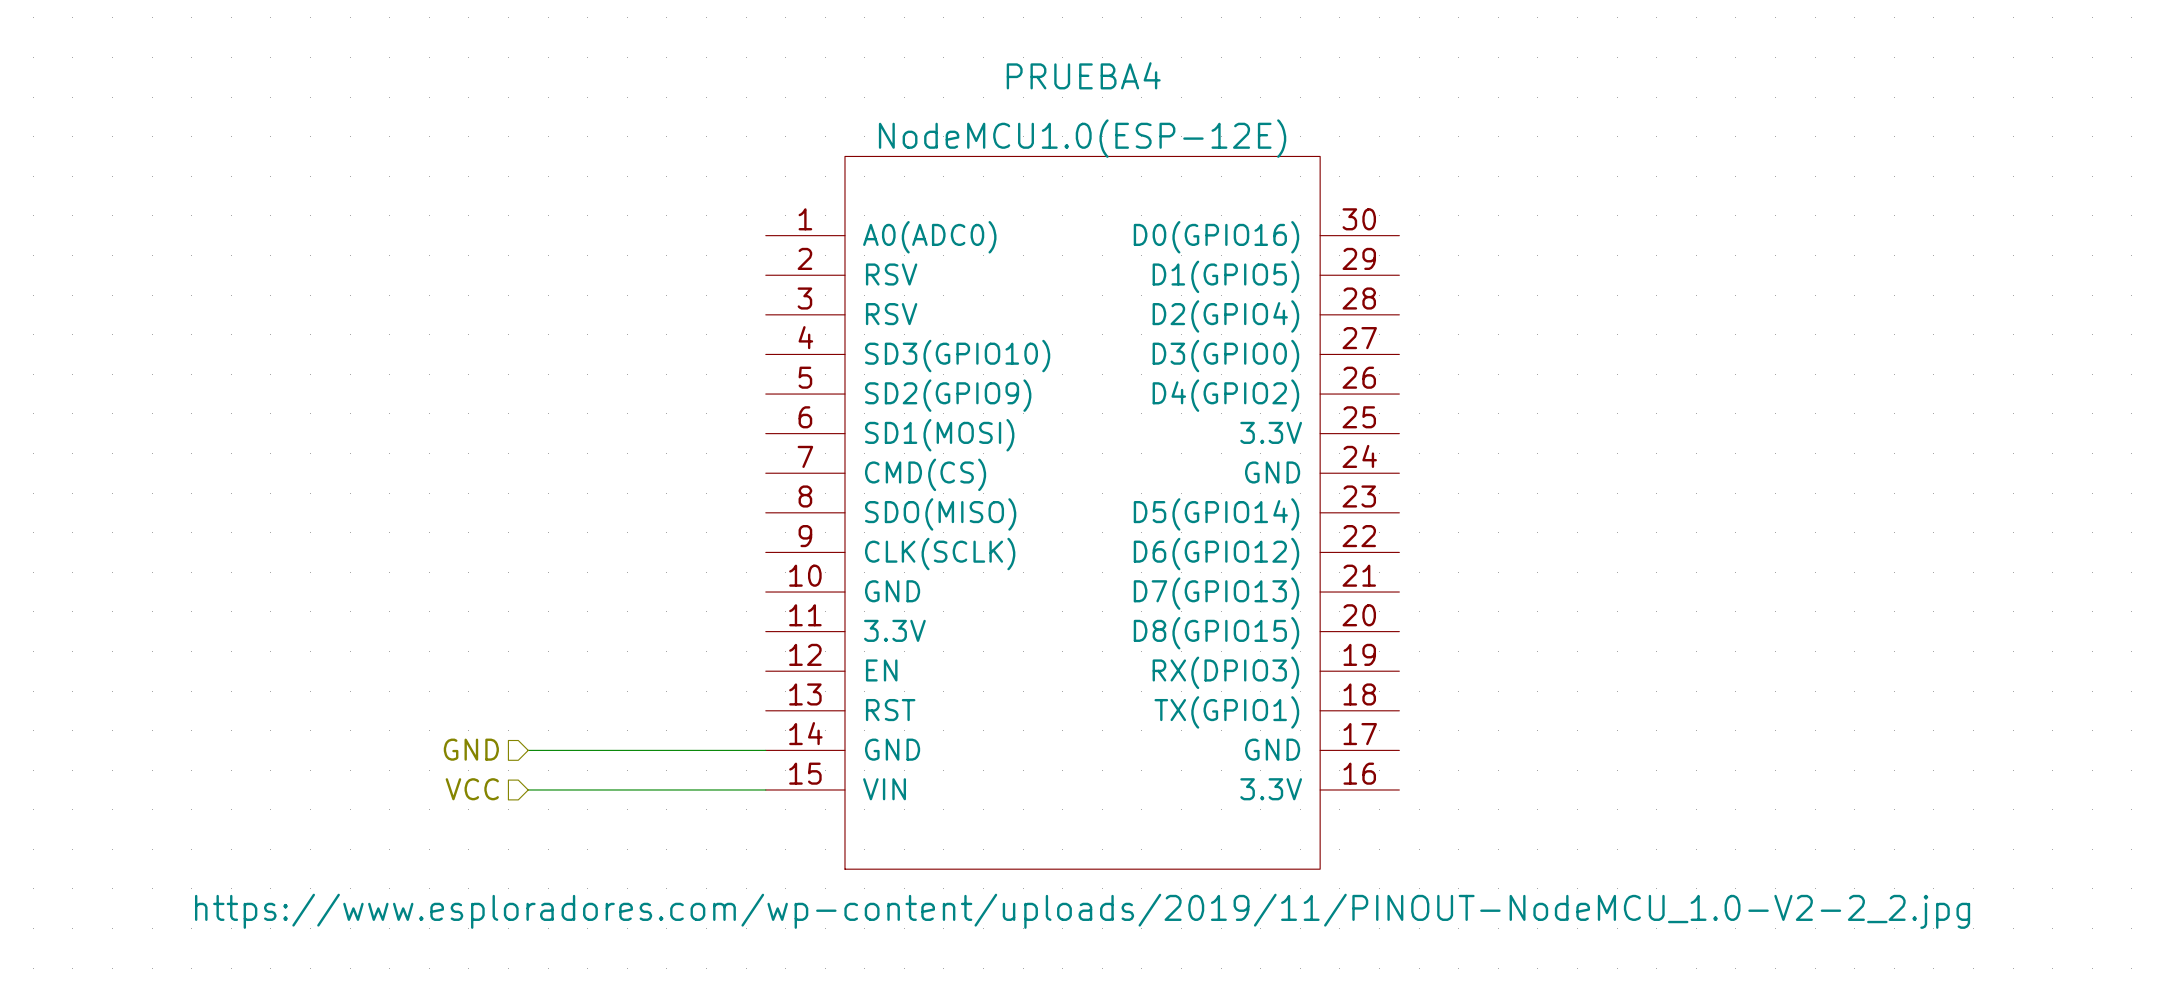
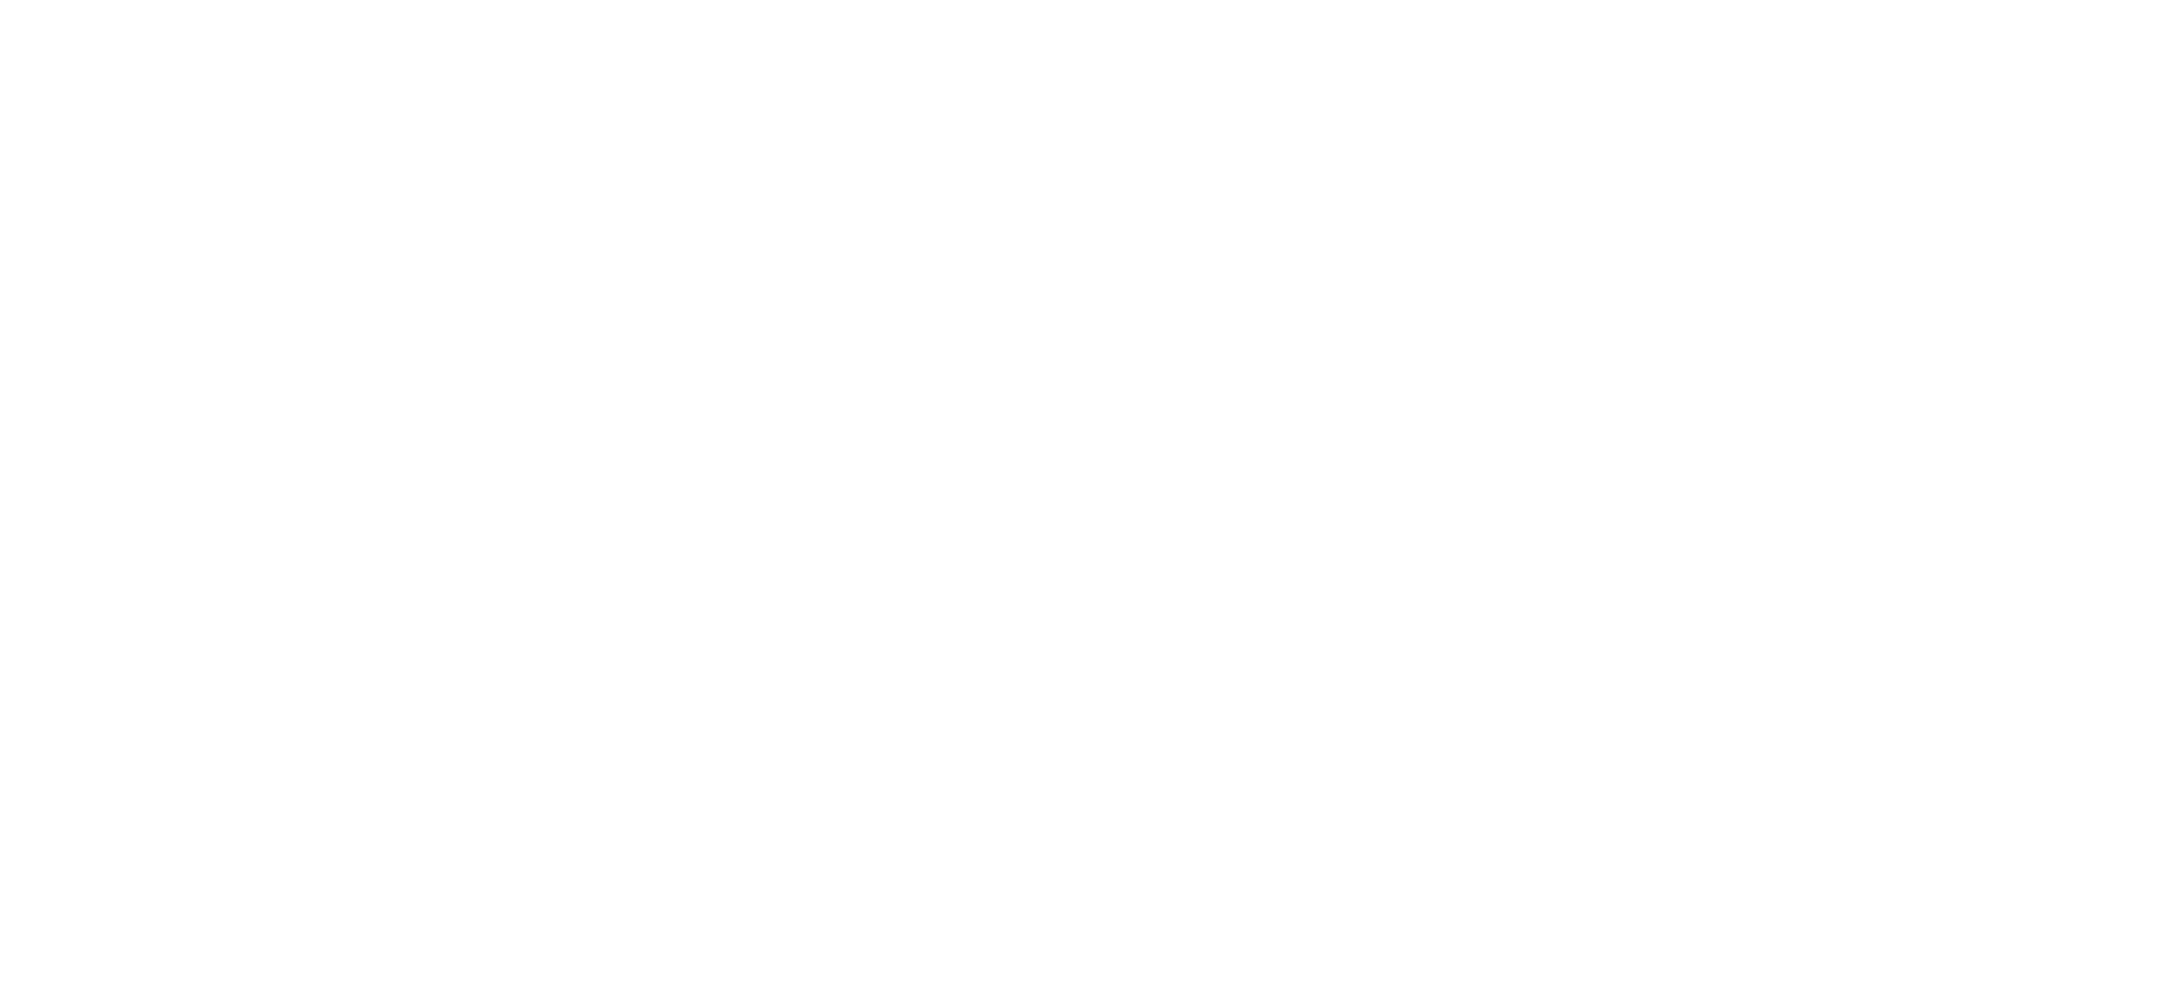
PRUEBA4: NodeMCU1.0(ESP-12E) (1082, 512) -> none
hierarchical label: GND (471, 749) -> none
wire: (528, 750) (765, 750) -> none
hierarchical label: VCC (472, 789) -> none
wire: (528, 789) (765, 789) -> none

